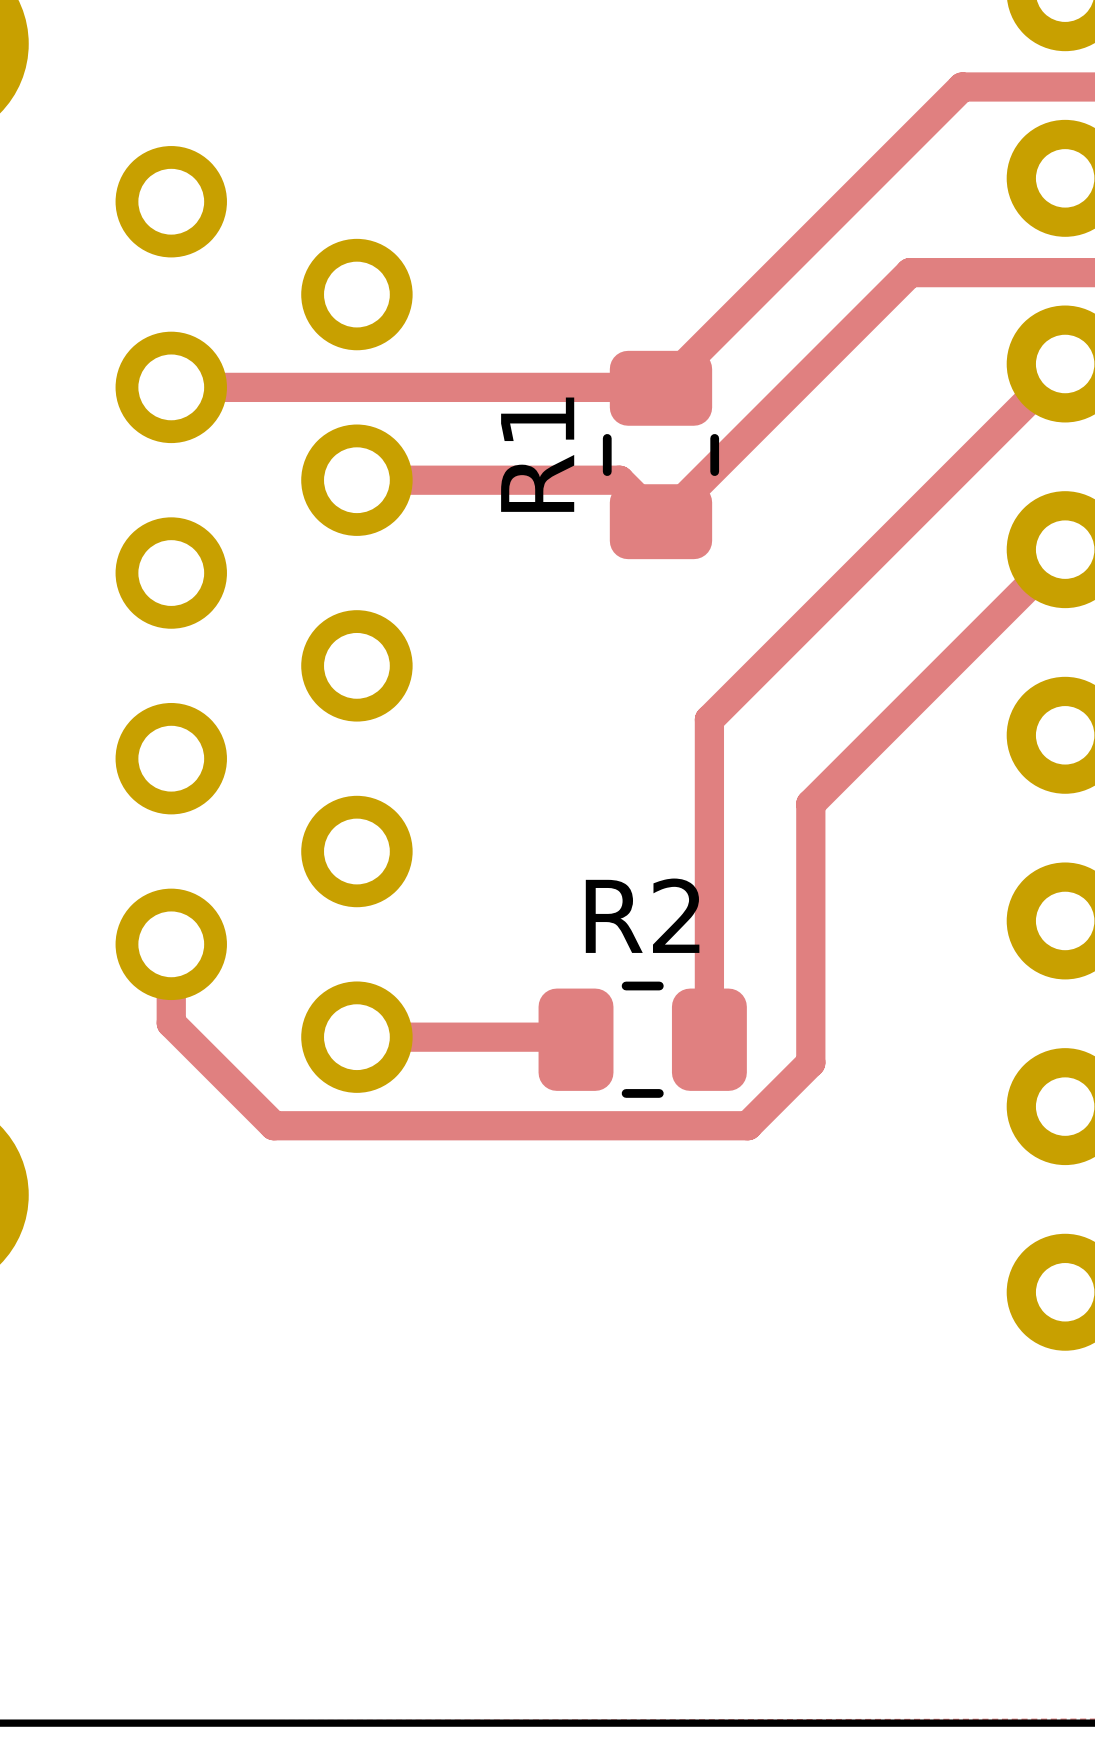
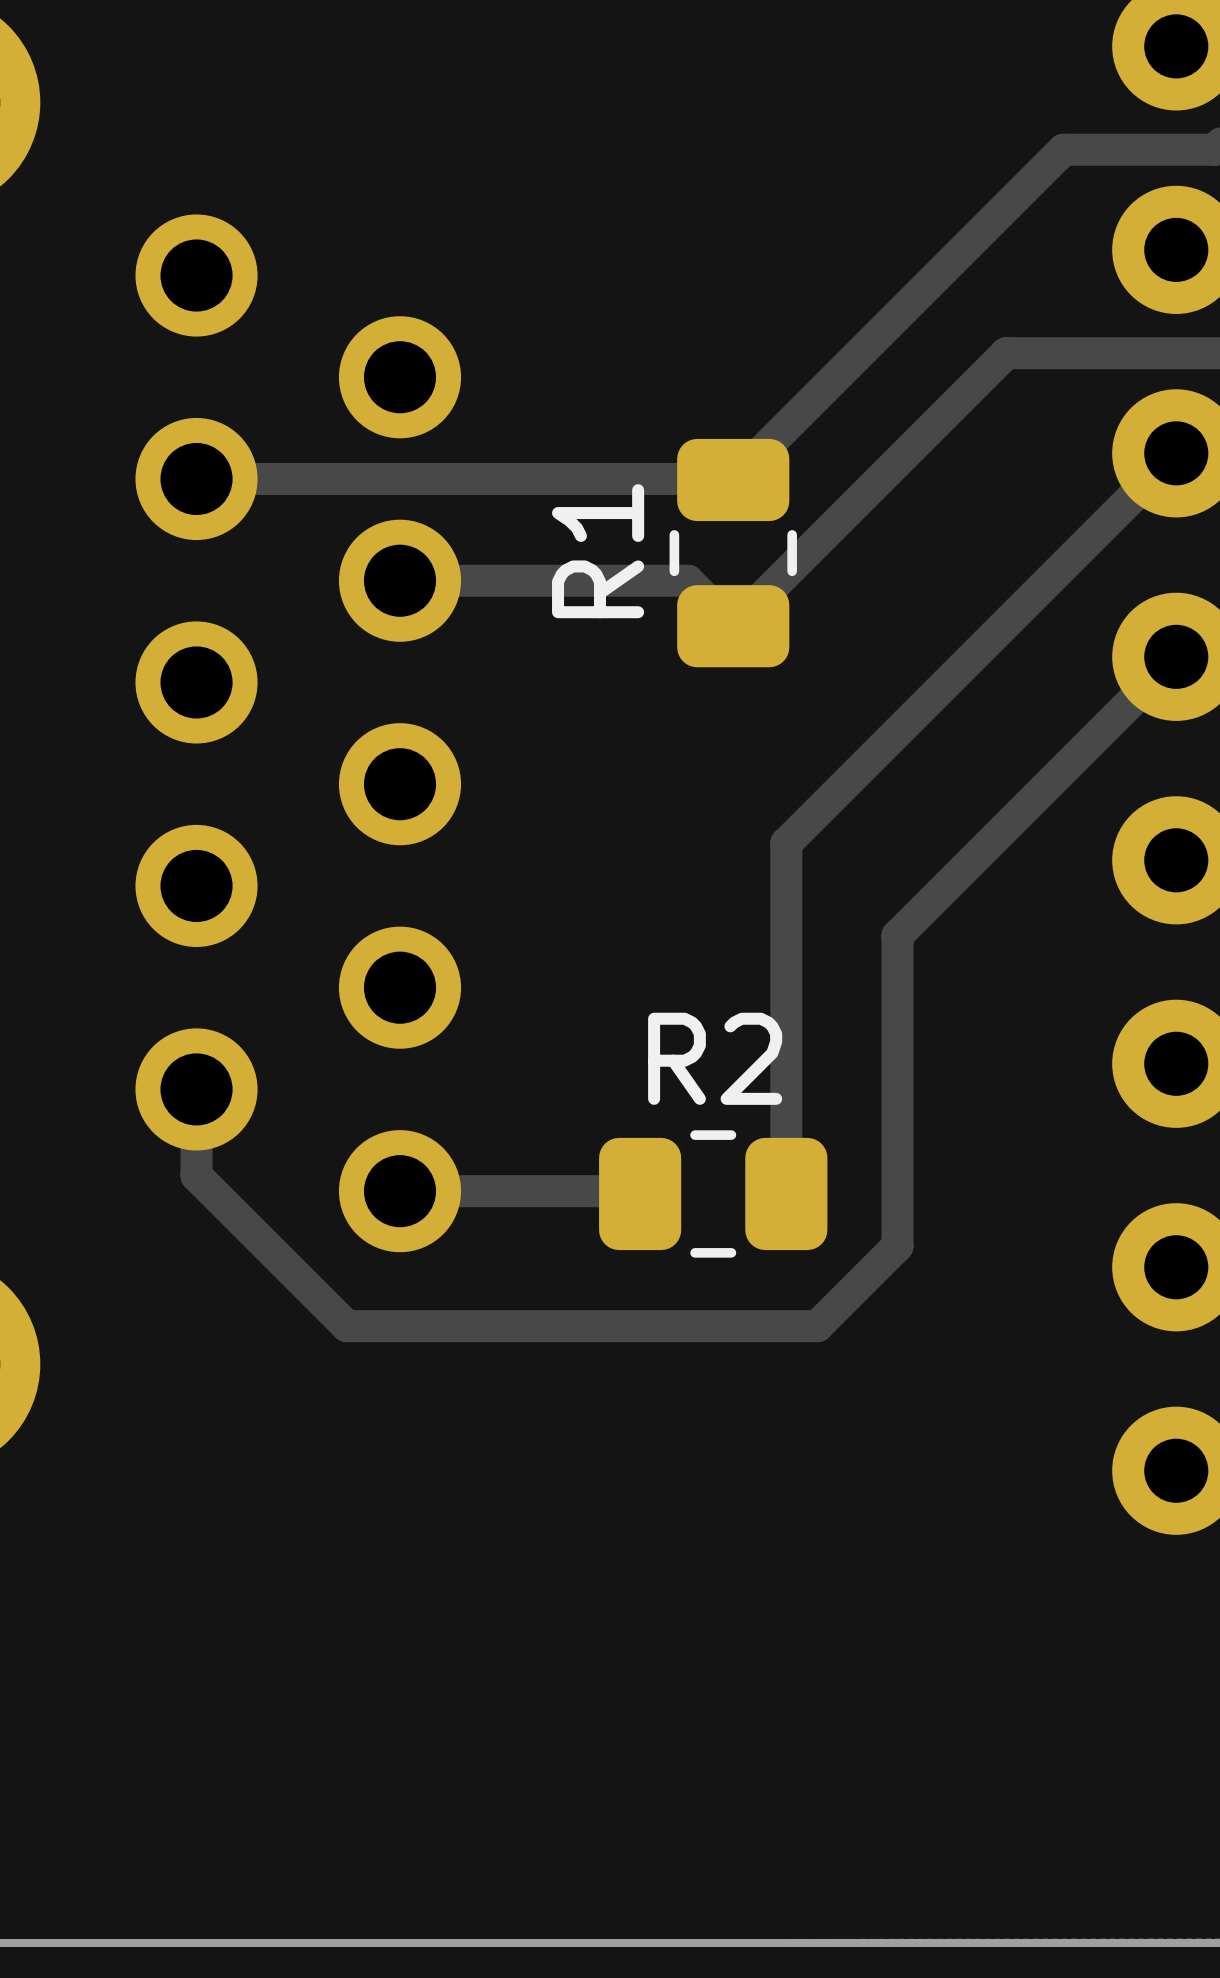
track: (810, 1062) (747, 1125) (273, 1125) -> (897, 1219) (897, 1246) (817, 1326) (346, 1326) (309, 1288)

